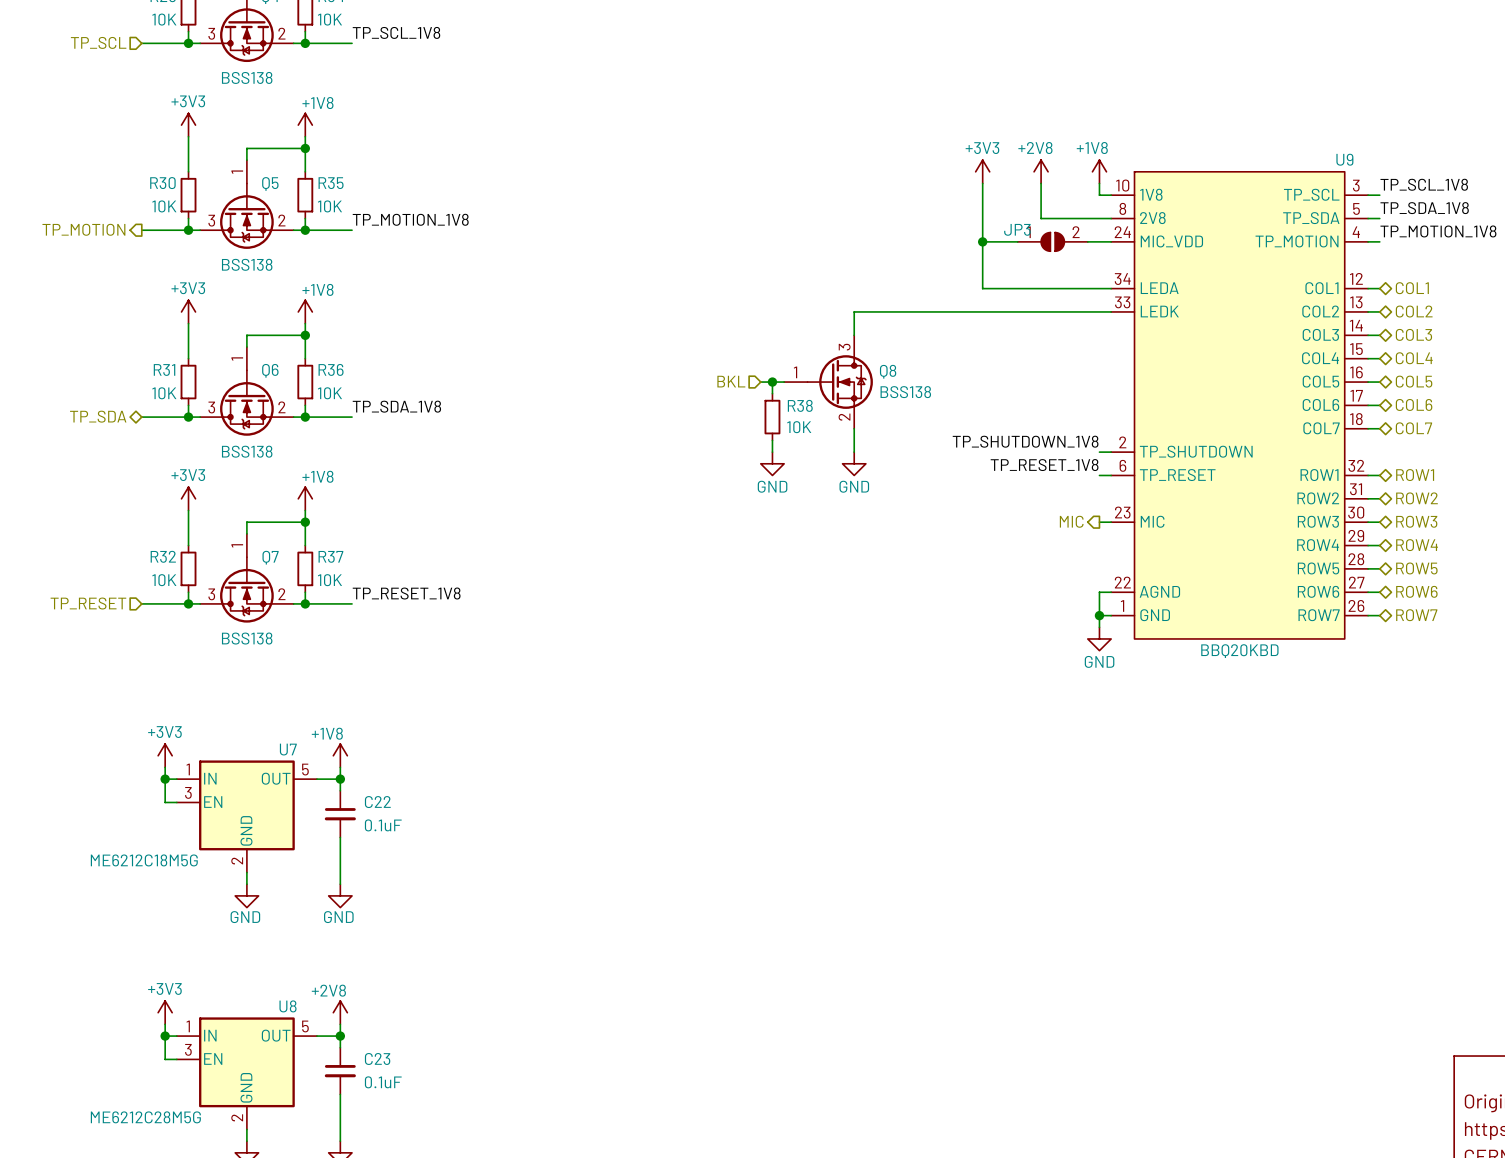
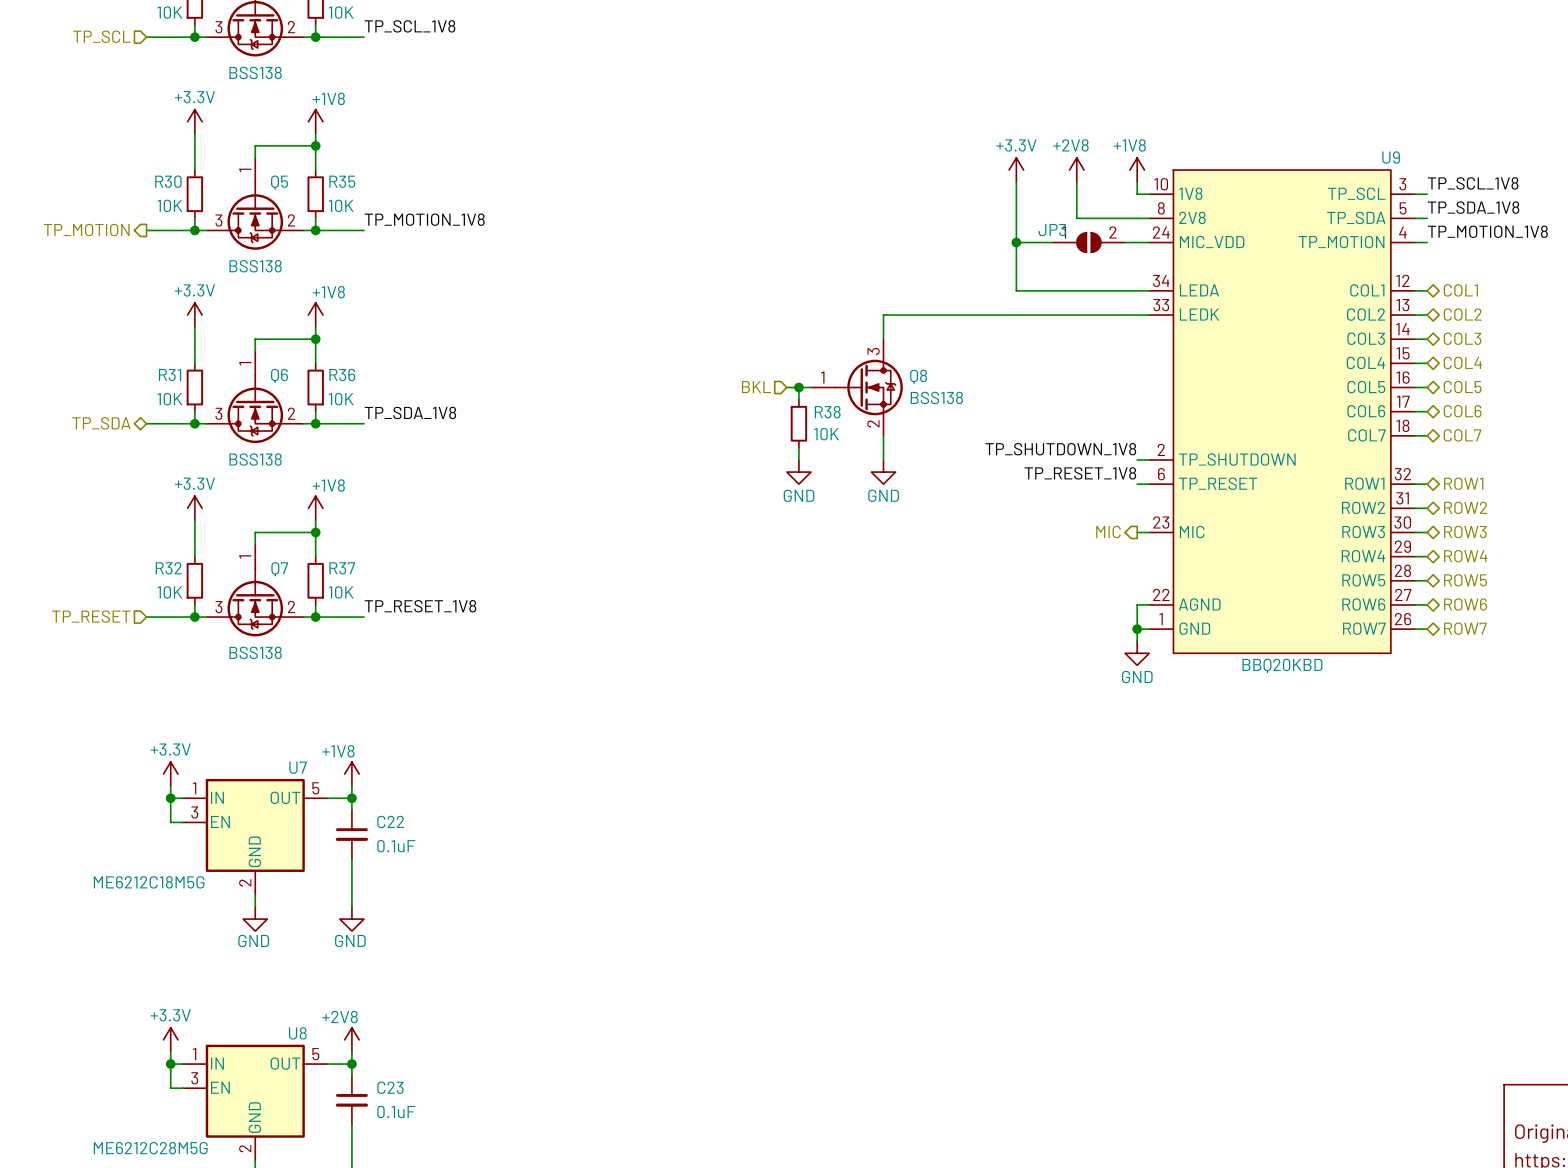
power symbol: +3V3 (188, 125) -> +3.3V (194, 121)
power symbol: +3V3 (982, 171) -> +3.3V (1016, 170)
power symbol: +3V3 (188, 311) -> +3.3V (194, 315)
power symbol: +3V3 (188, 498) -> +3.3V (194, 508)
power symbol: +3V3 (165, 755) -> +3.3V (170, 774)
power symbol: +3V3 (165, 1012) -> +3.3V (170, 1039)

